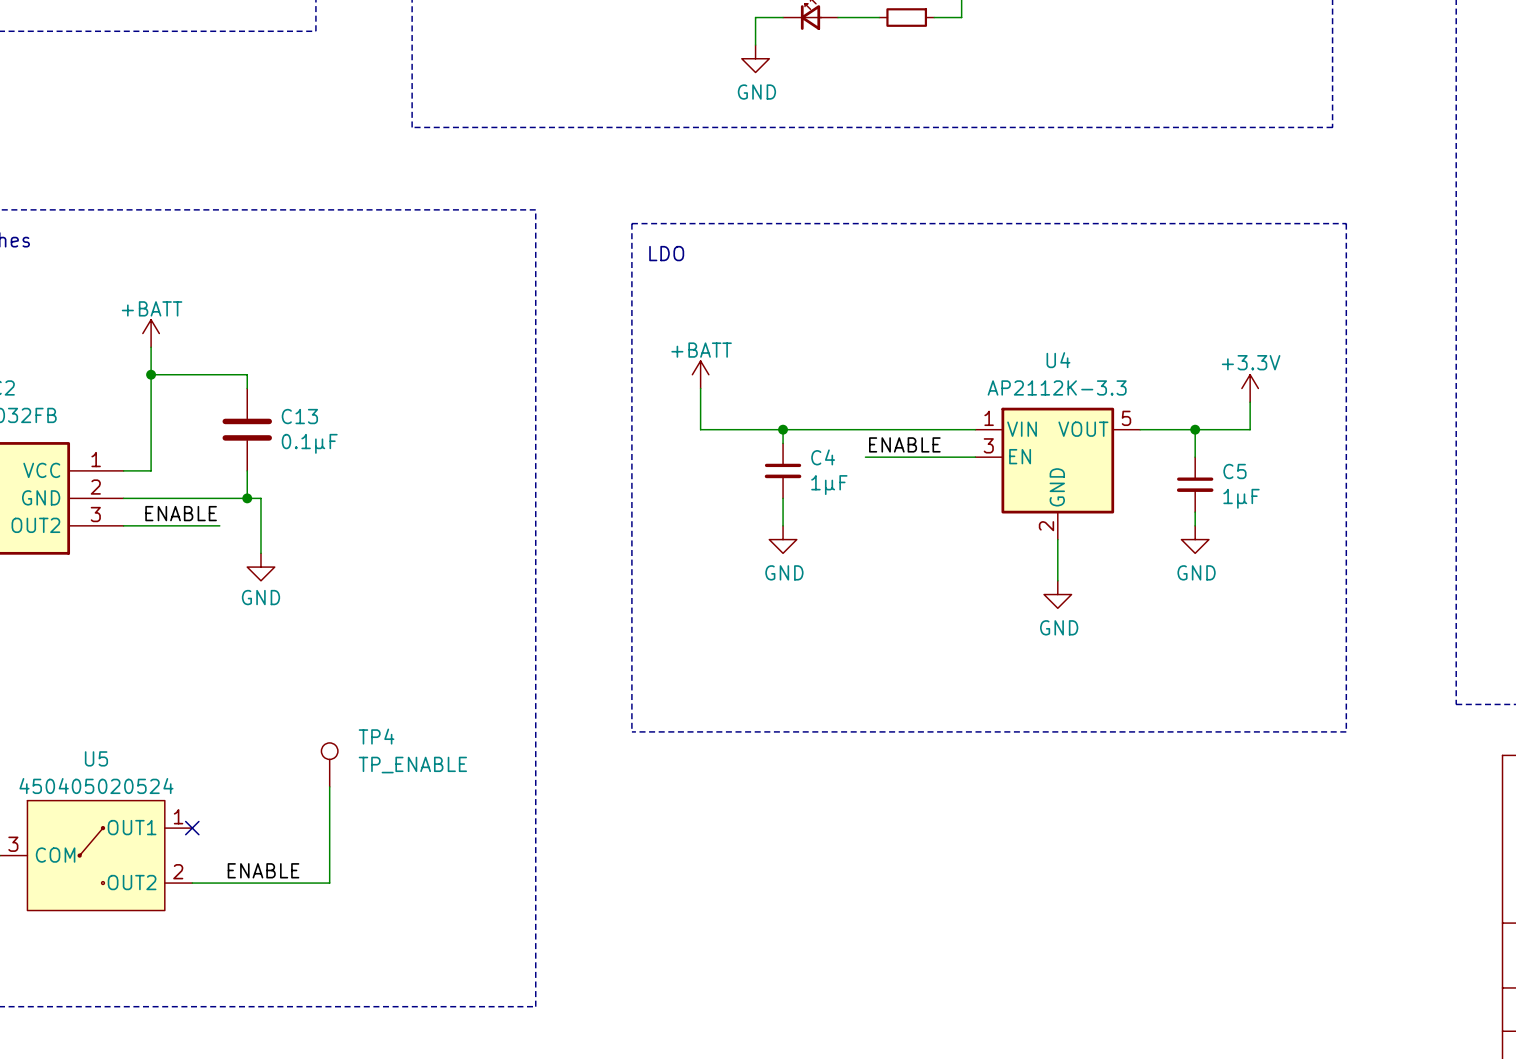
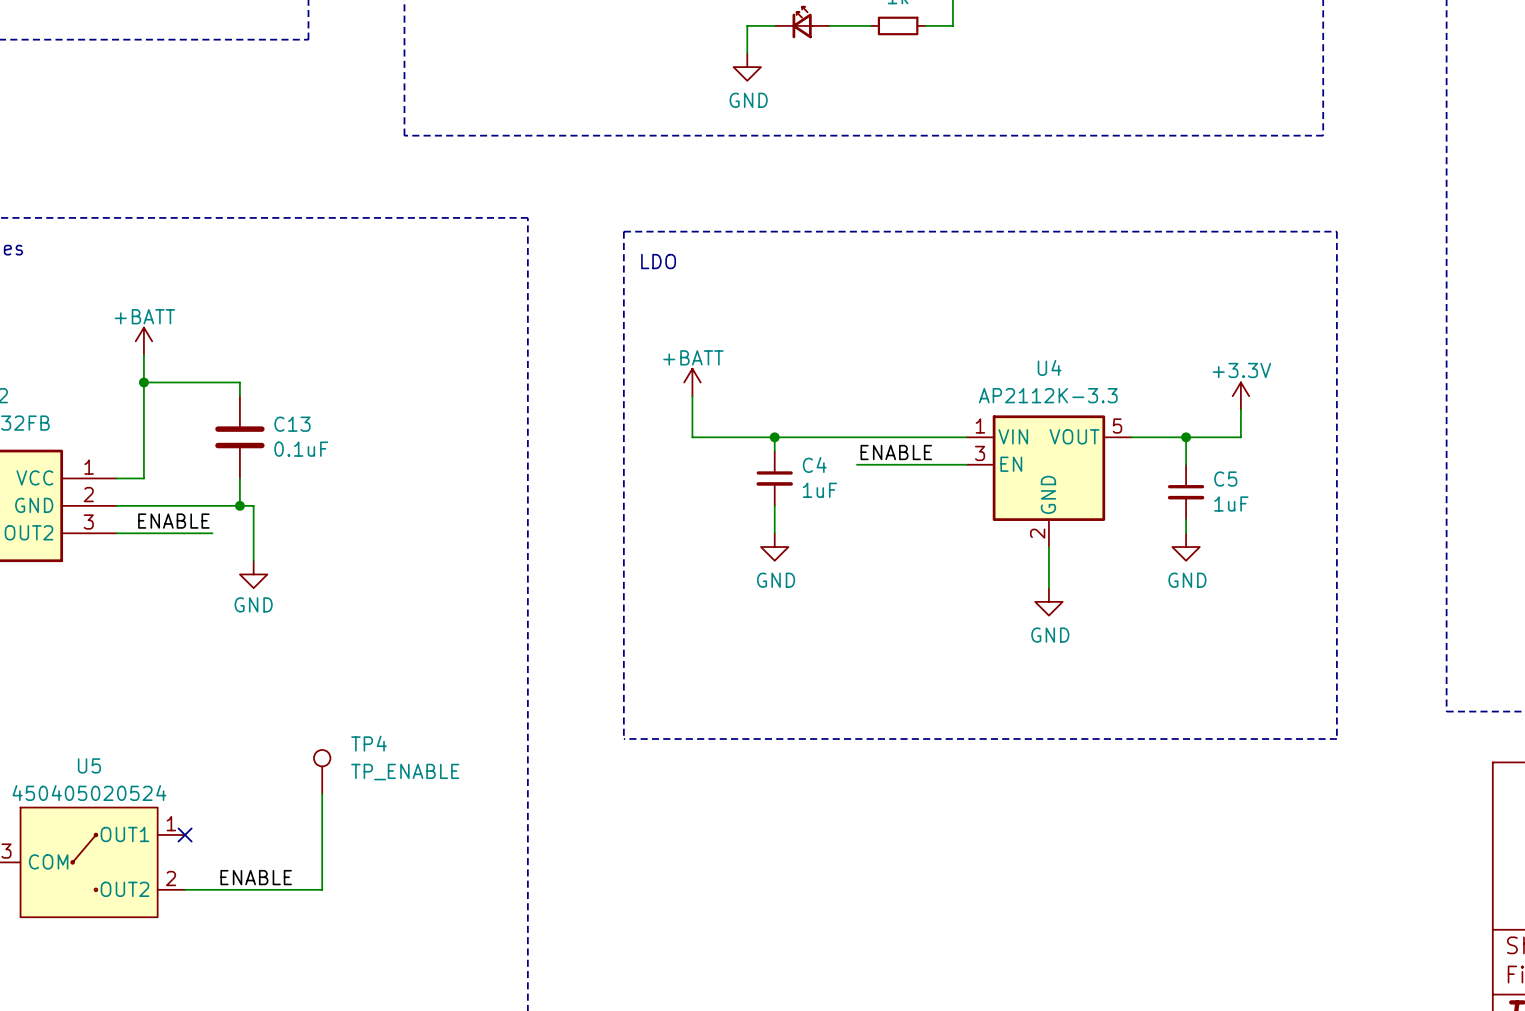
C13 value: 0.1µF (309, 443) -> 0.1uF (301, 449)
C4 value: 1µF (829, 485) -> 1uF (819, 490)
C5 value: 1µF (1241, 498) -> 1uF (1231, 504)

